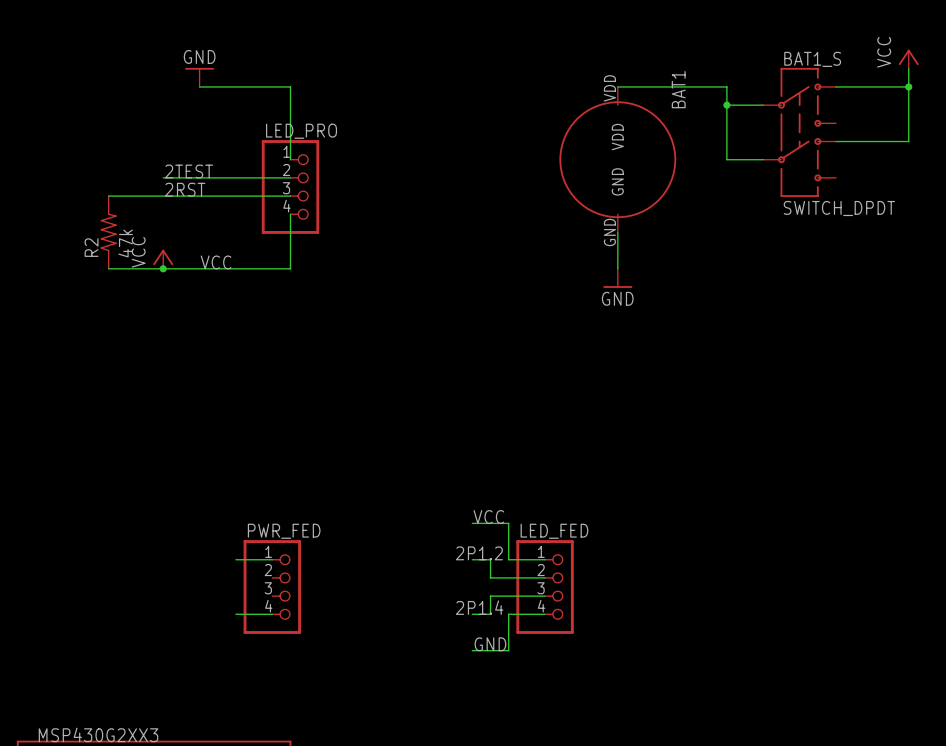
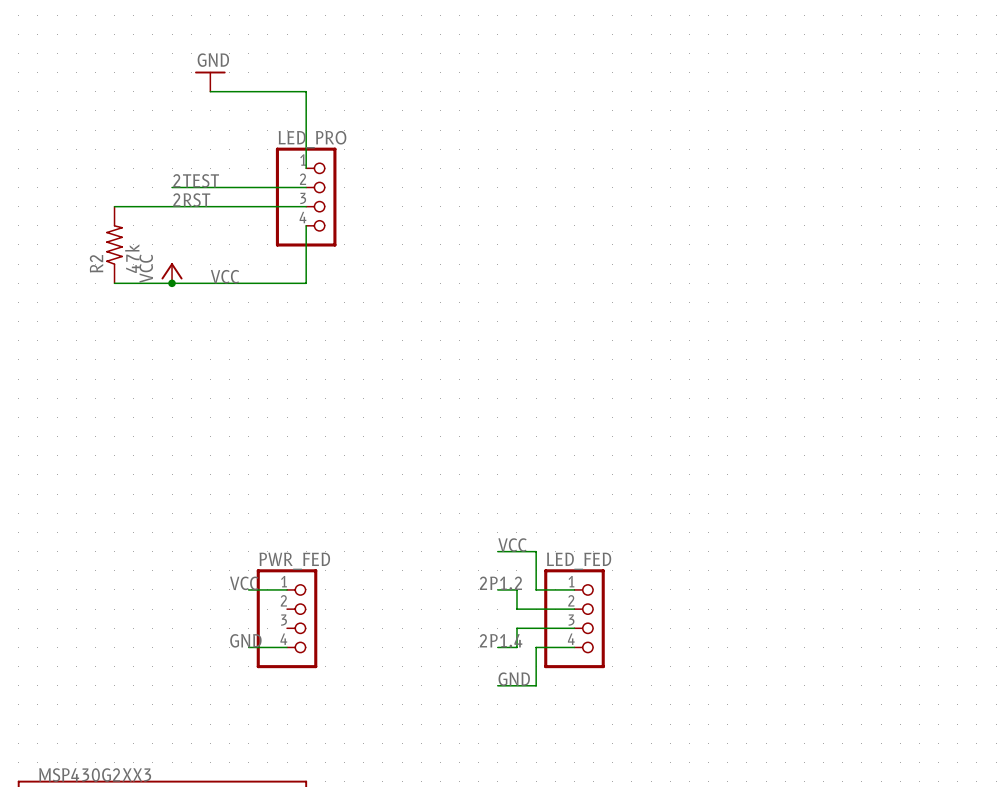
power symbol: VCC (908, 59) -> none
wire: (908, 68) (908, 141) (836, 141) -> none
wire: (617, 86) (726, 86) (726, 159) (763, 159) -> none
wire: (836, 86) (908, 86) -> none
junction: (908, 86) -> none
wire: (726, 105) (763, 105) -> none
junction: (726, 105) -> none
BAT1_S: SWITCH_DPDT (799, 132) -> none
BAT1: (617, 159) -> none
wire: (617, 232) (617, 268) -> none
power symbol: GND (617, 278) -> none
label: none -> VCC (244, 583)
label: none -> GND (245, 640)

